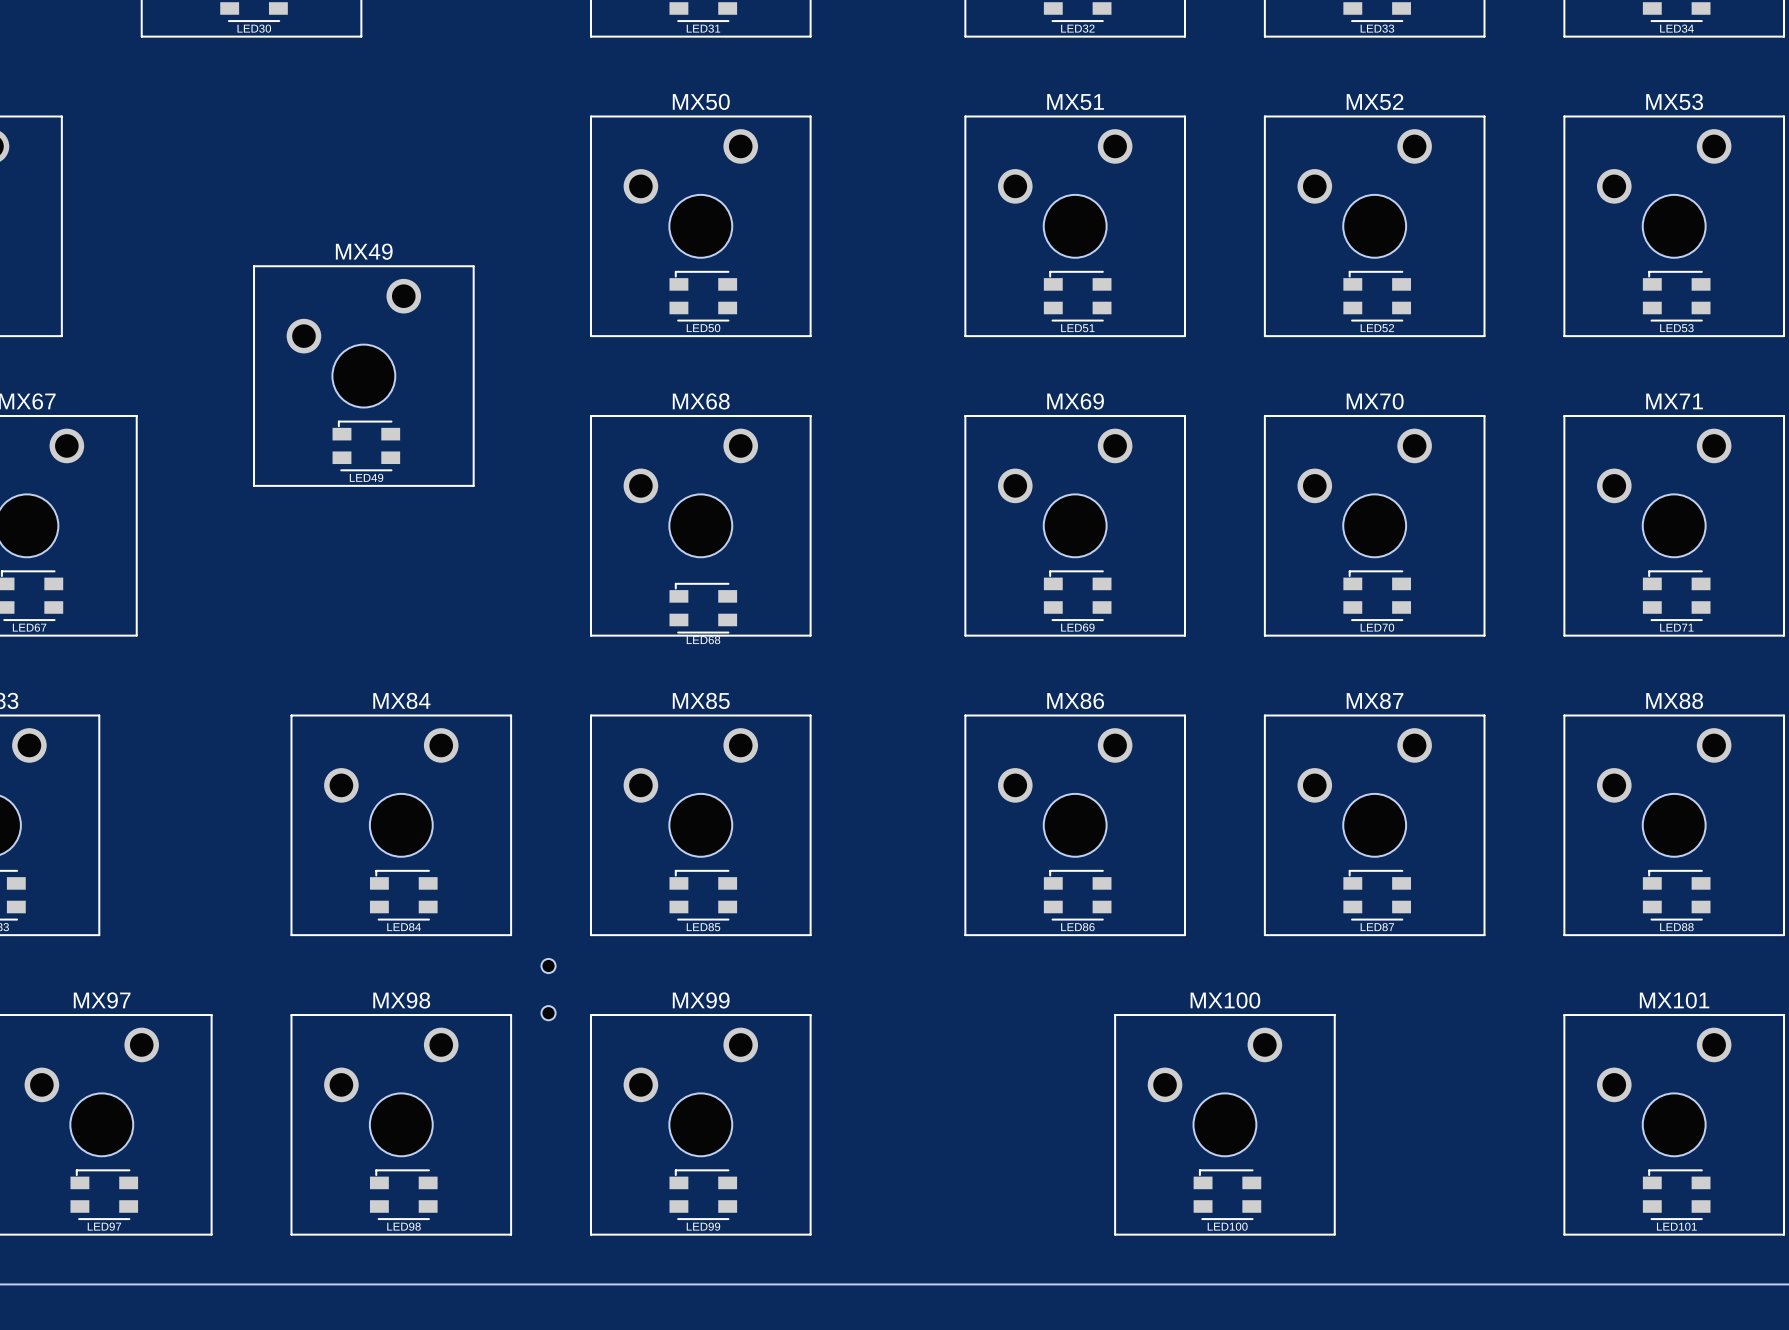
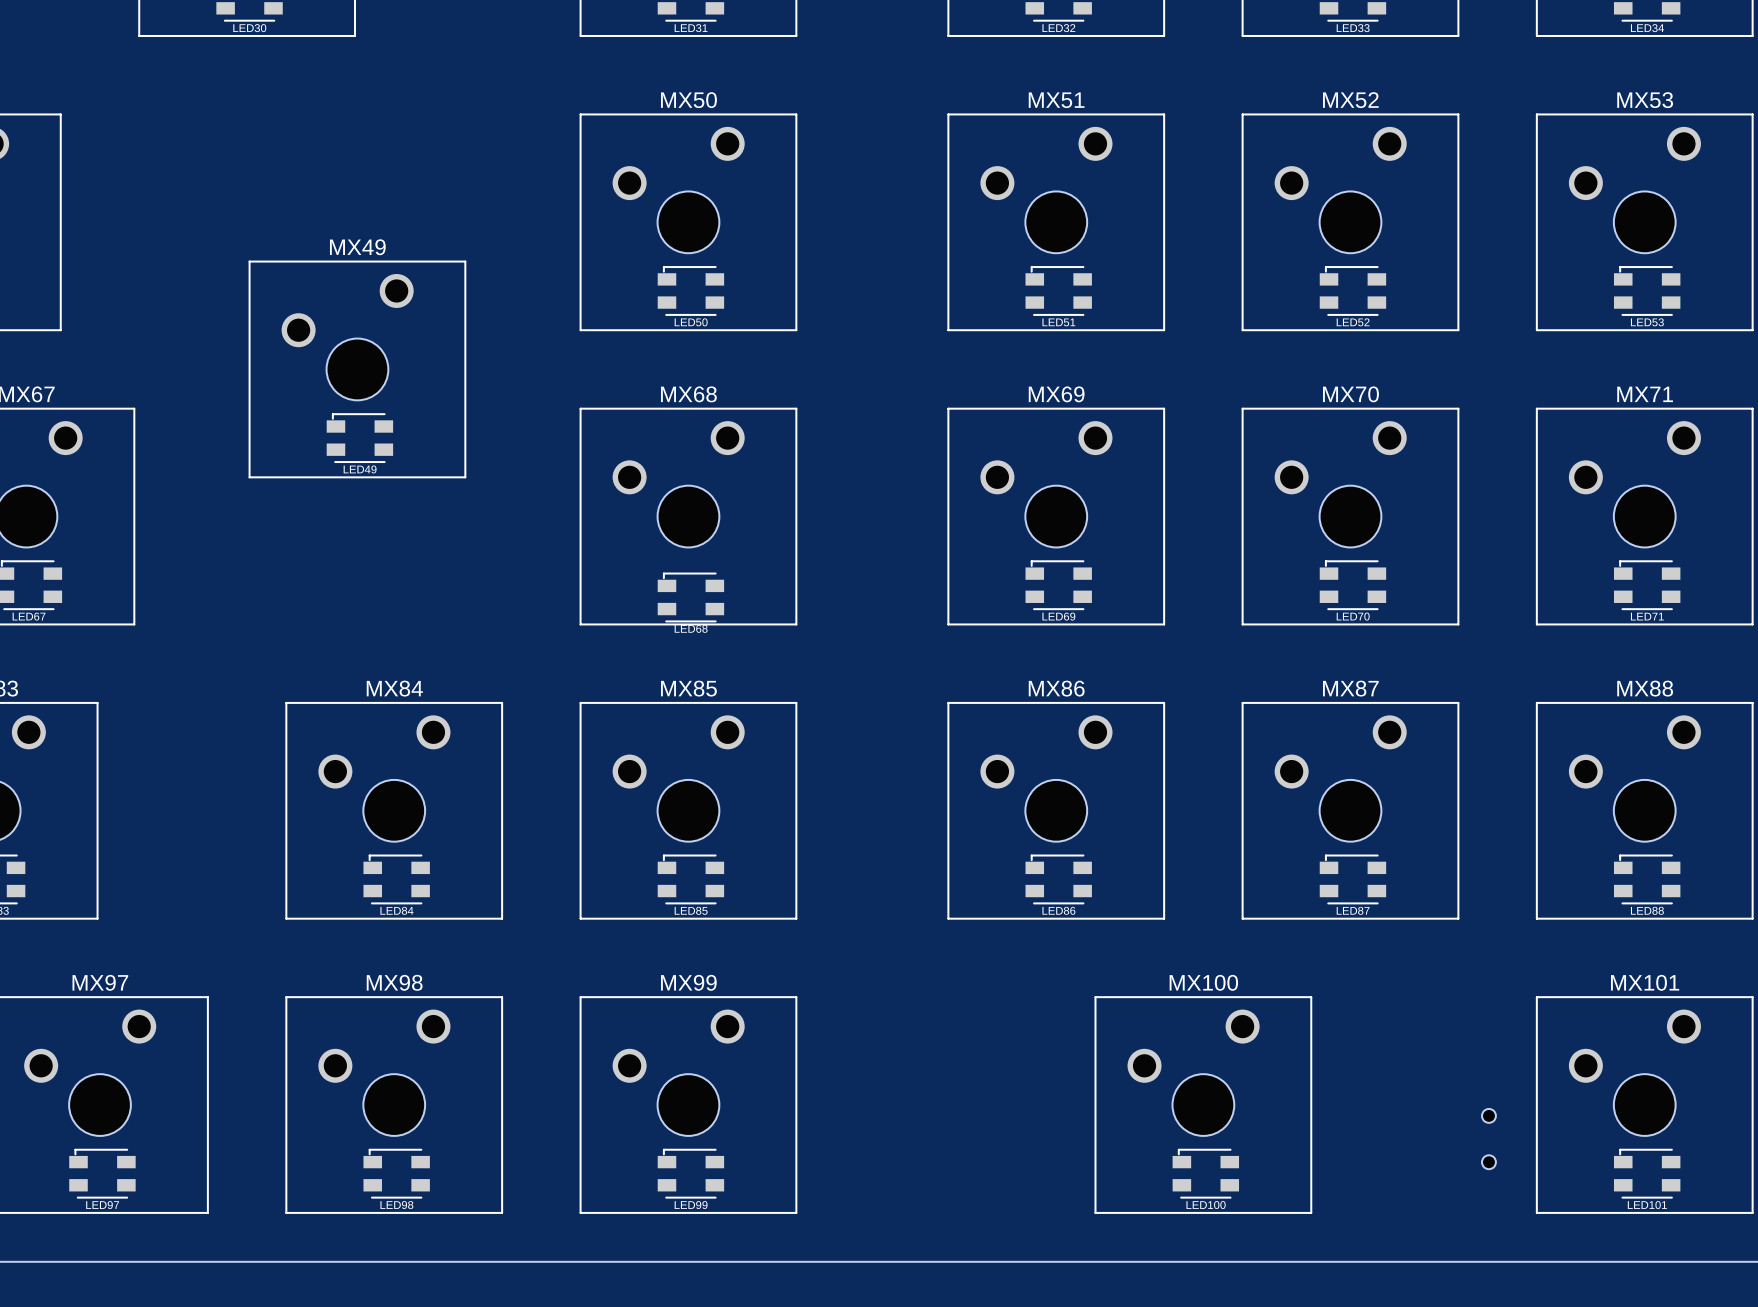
part: (548, 989) -> none
part: none -> (1488, 1139)

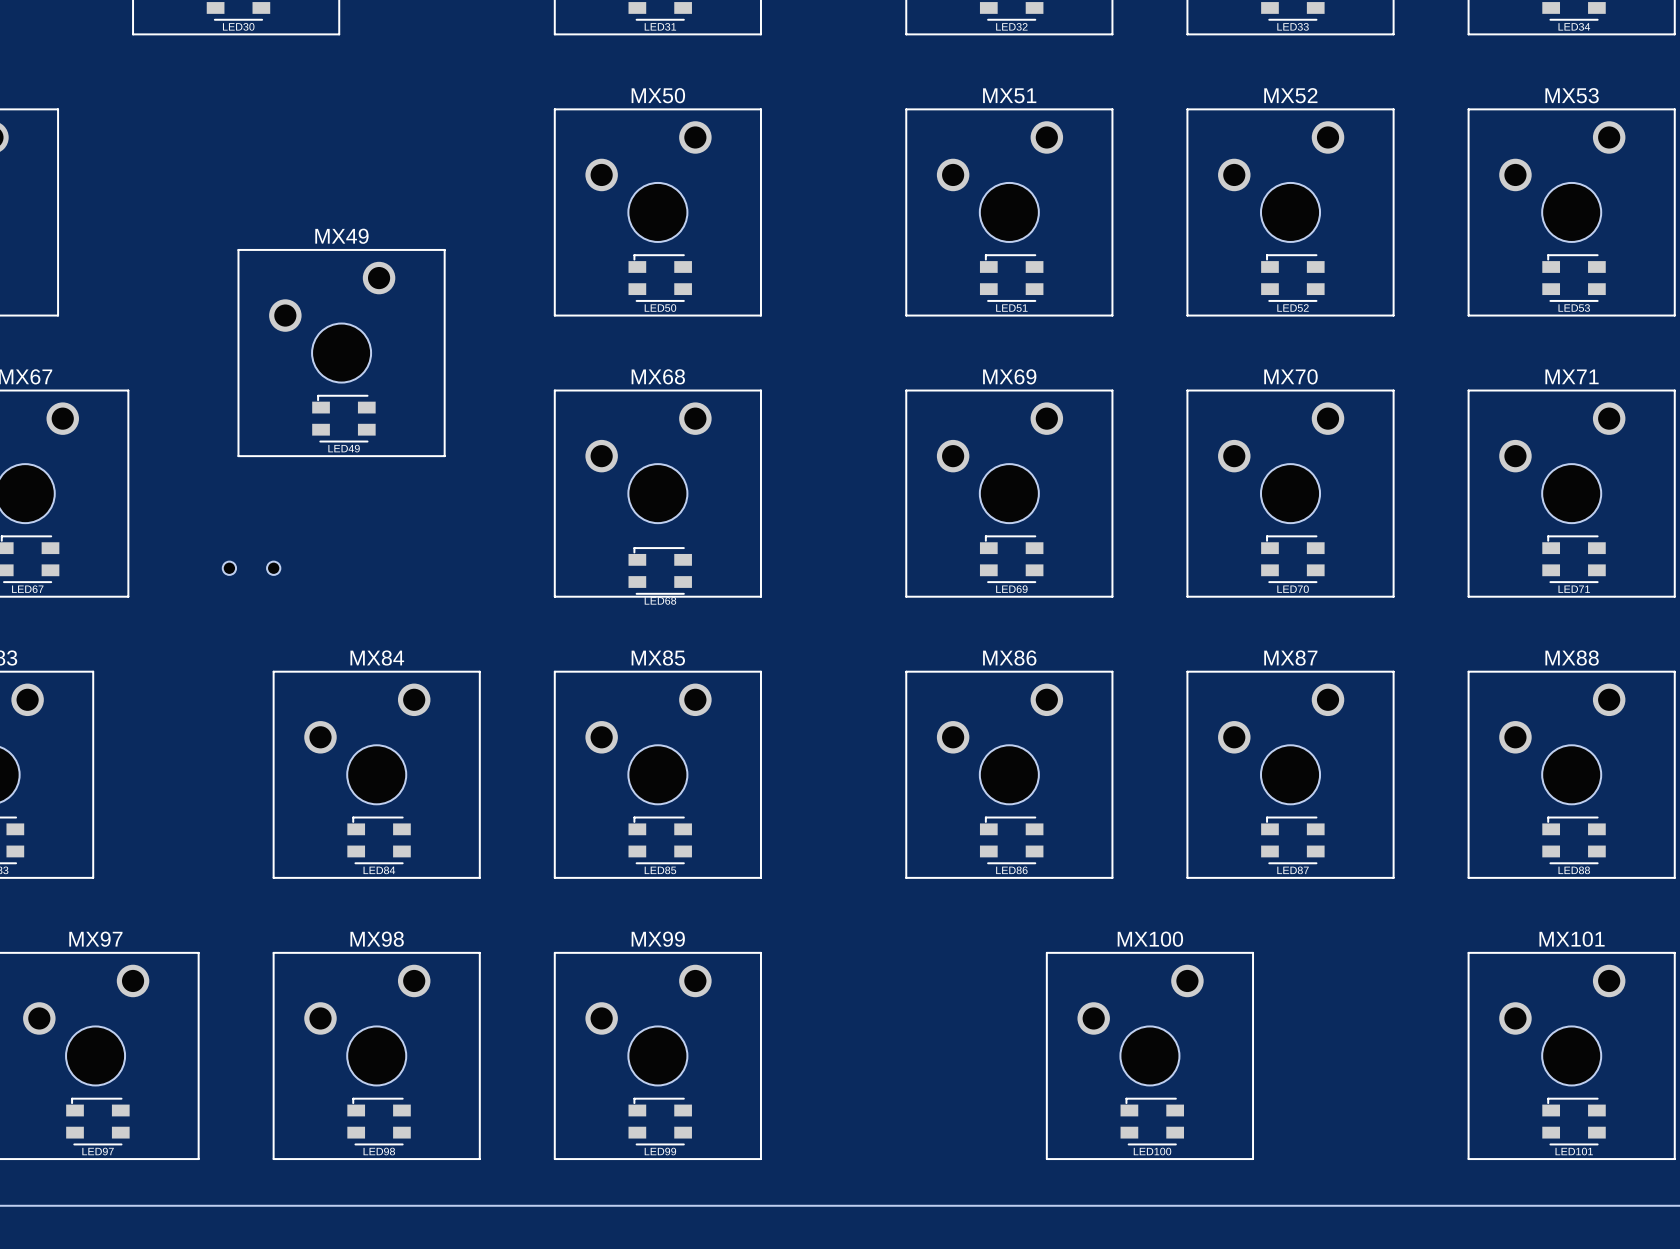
part: none -> (251, 568)
part: (1488, 1139) -> none

